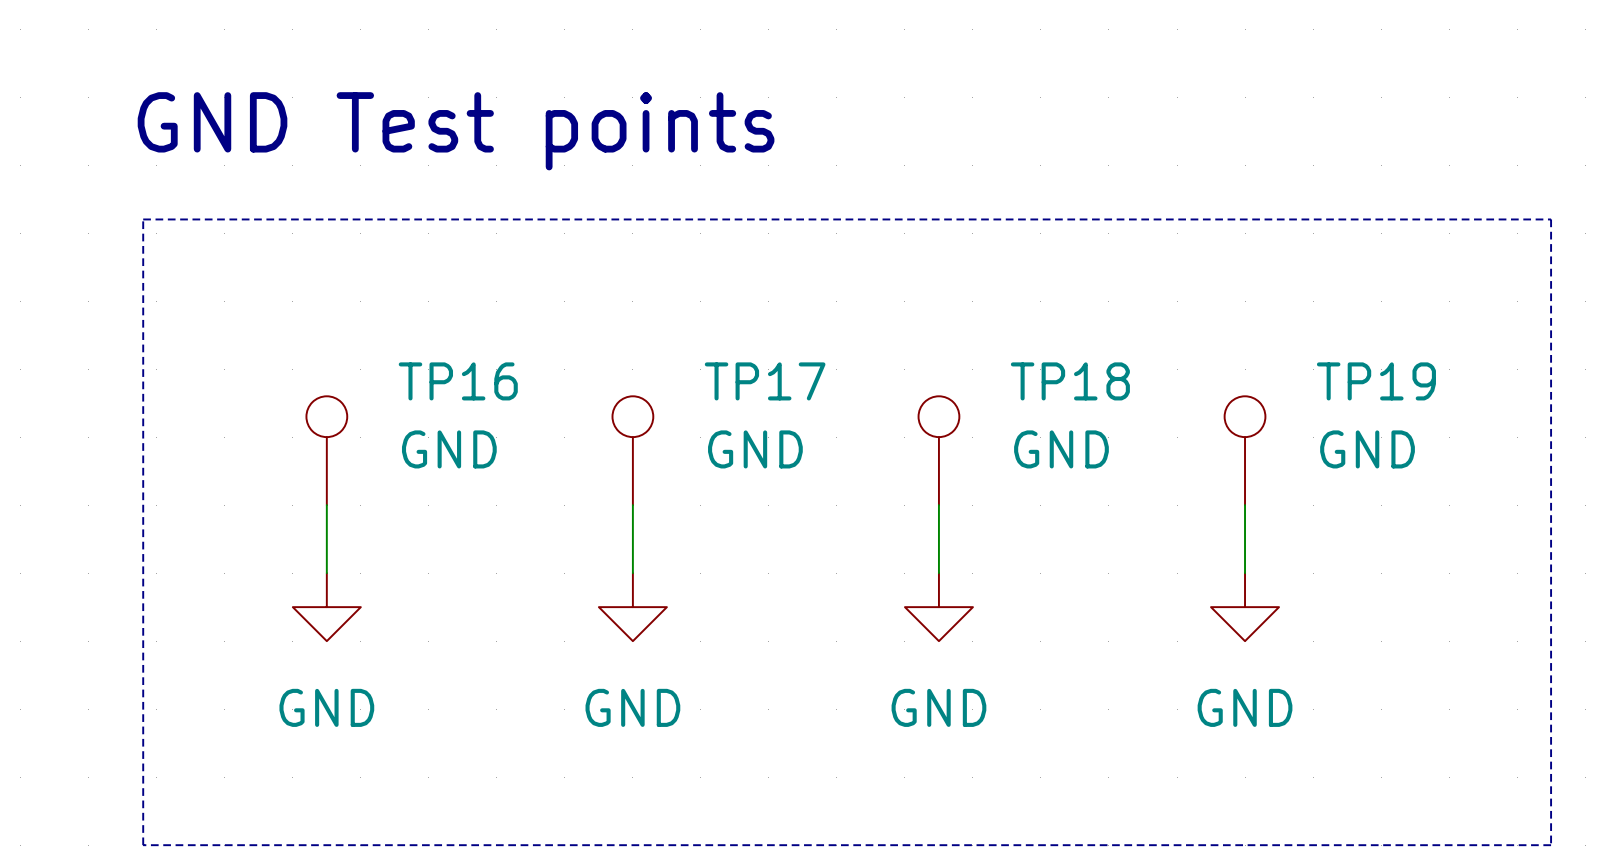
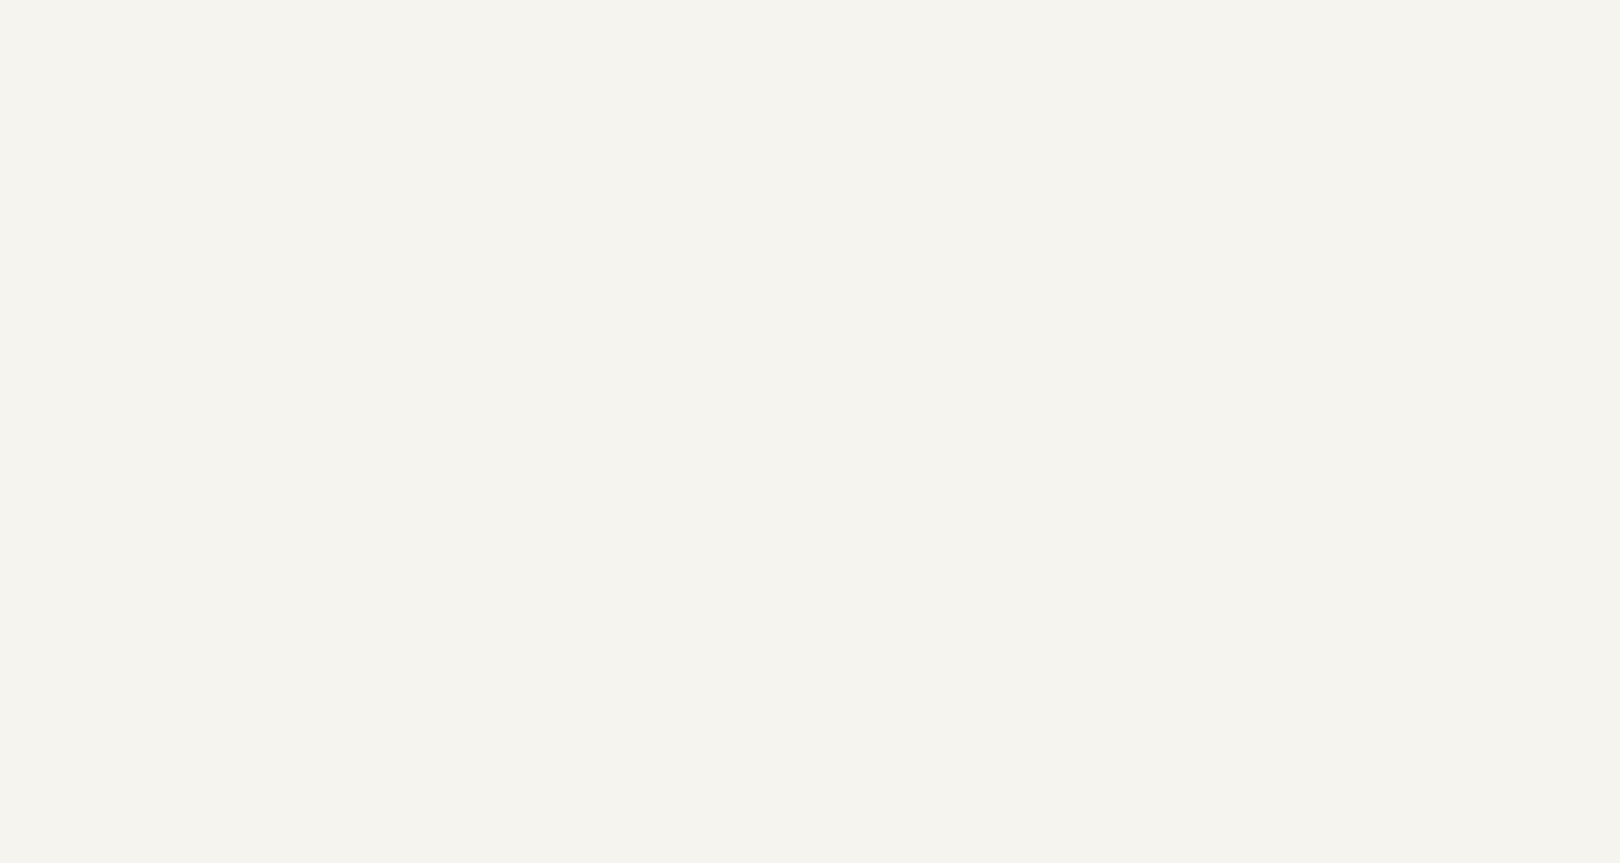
text: GND Test points (456, 131) -> none
line: (143, 219) (1551, 219) (1551, 845) (143, 845) (143, 219) -> none
TP16: GND (326, 450) -> none
TP17: GND (632, 450) -> none
TP18: GND (938, 450) -> none
TP19: GND (1245, 450) -> none
wire: (326, 505) (326, 573) -> none
wire: (632, 505) (632, 573) -> none
wire: (938, 505) (938, 573) -> none
wire: (1245, 505) (1245, 573) -> none
power symbol: GND (326, 607) -> none
power symbol: GND (632, 607) -> none
power symbol: GND (938, 607) -> none
power symbol: GND (1245, 607) -> none

